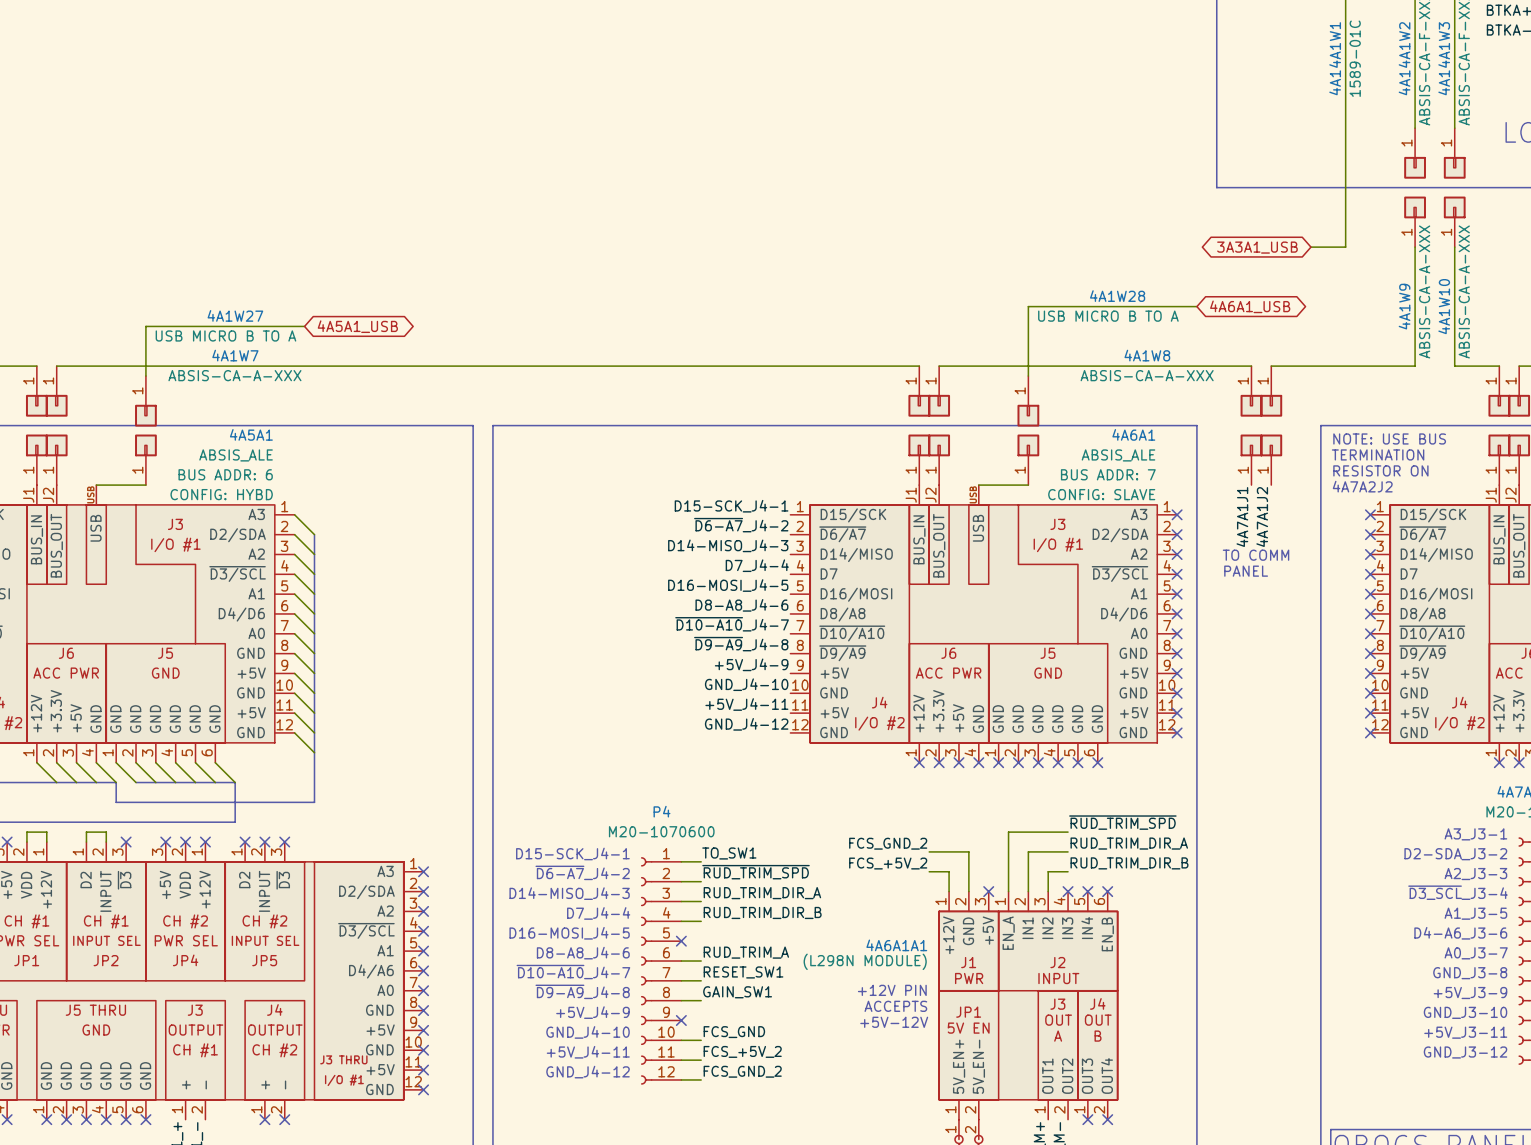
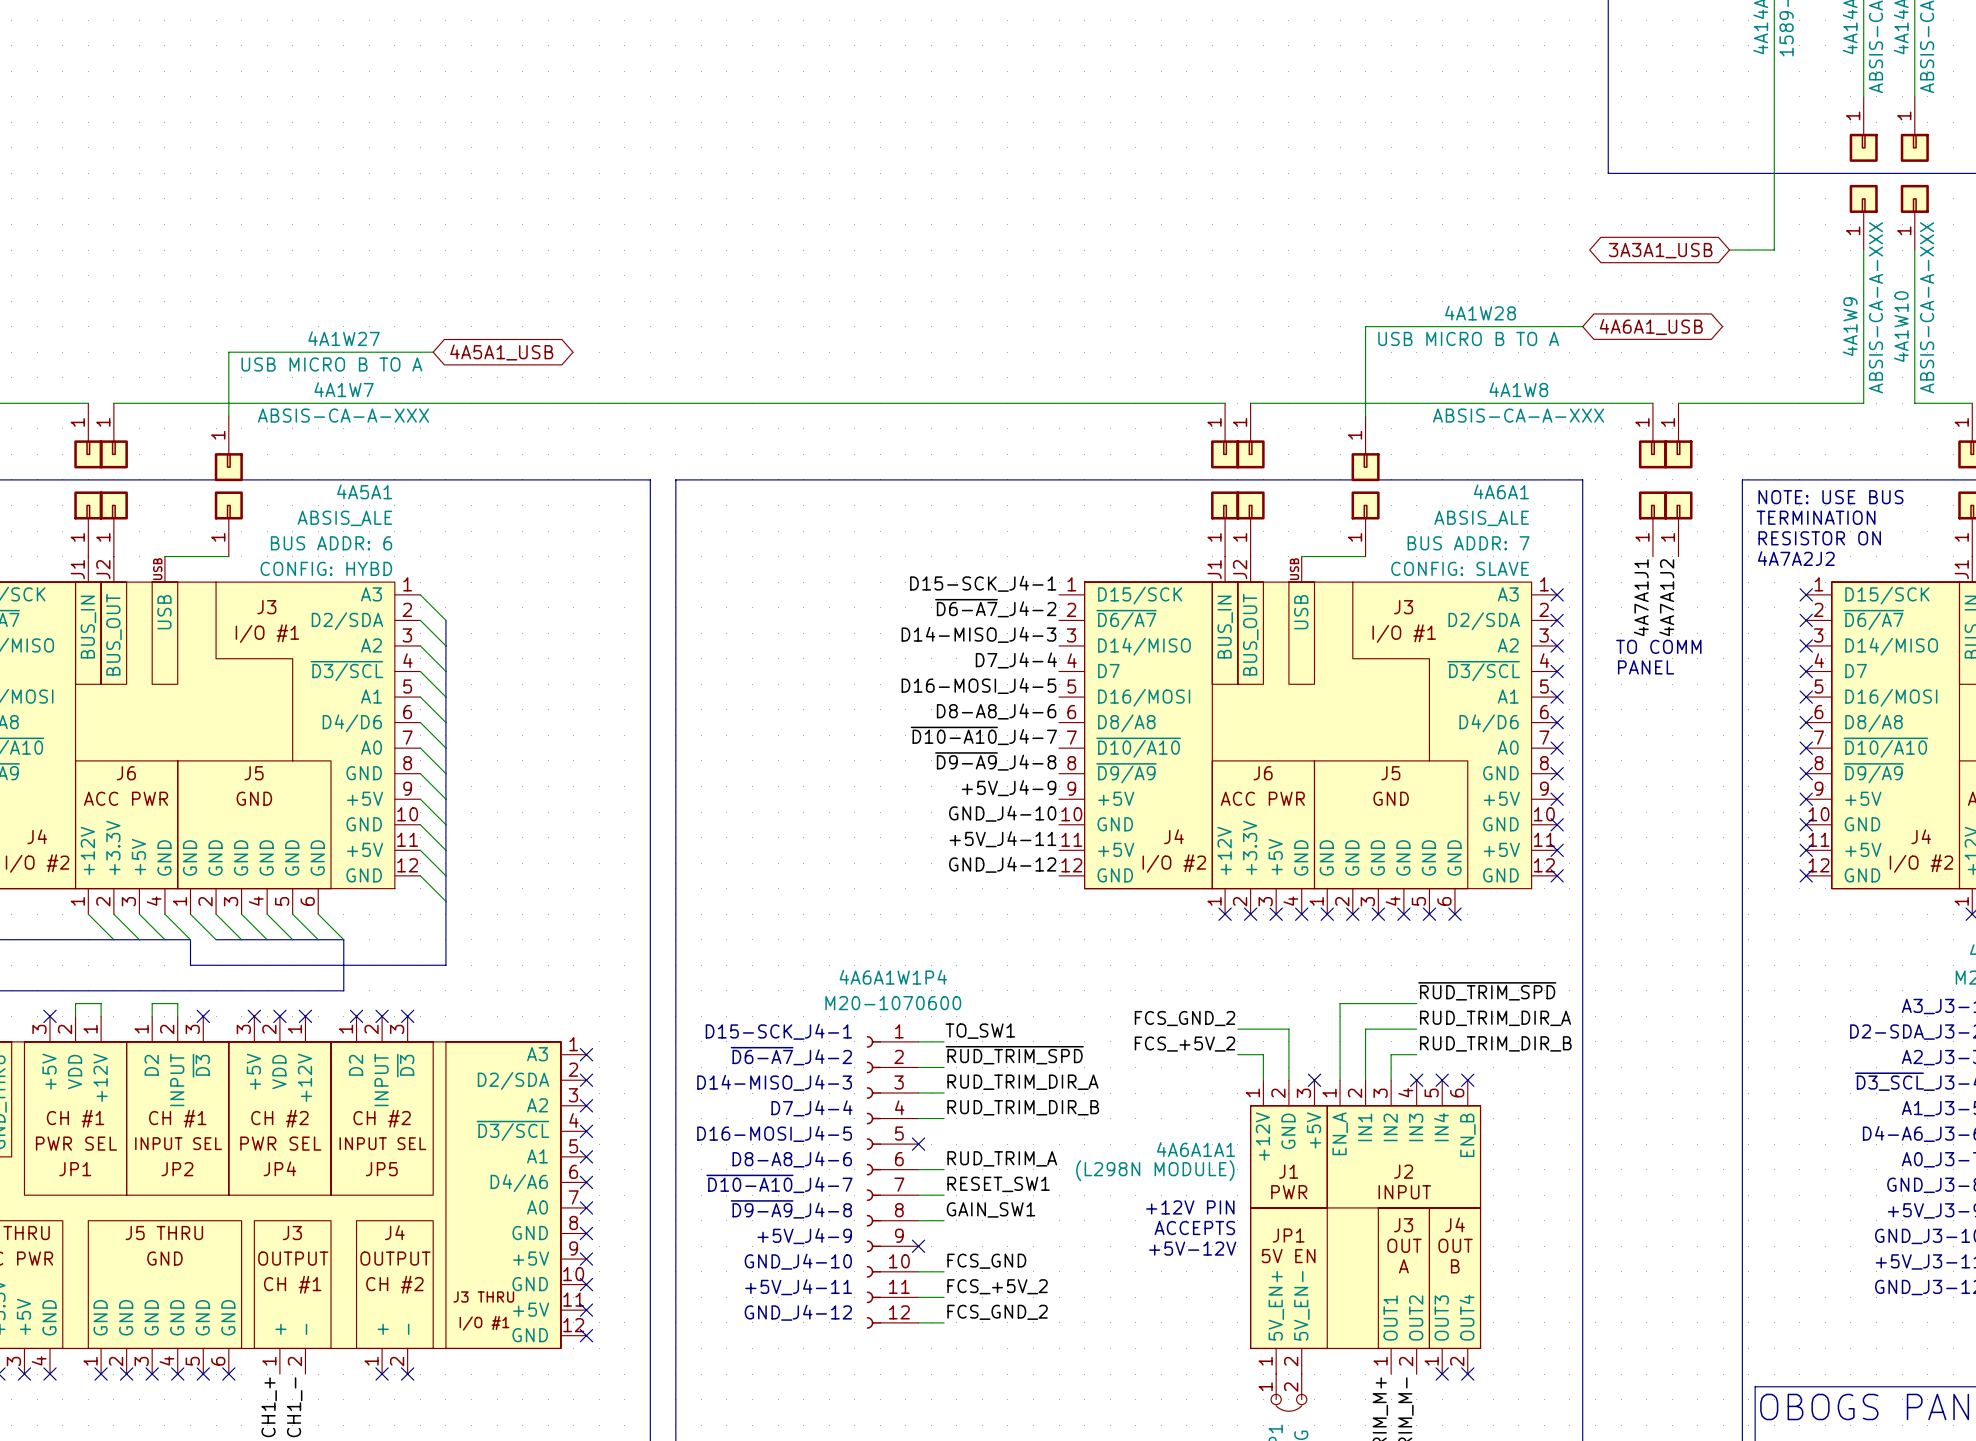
P4 name: P4 (661, 811) -> 4A6A1W1P4 (893, 977)

